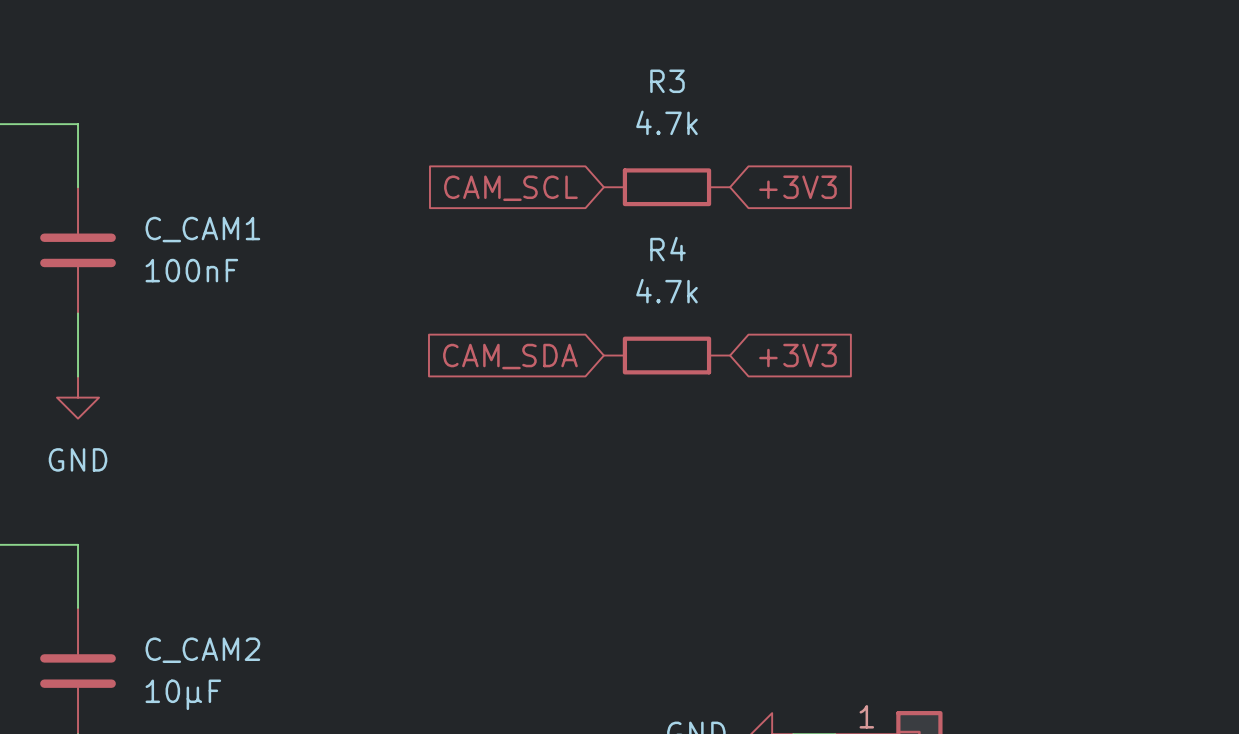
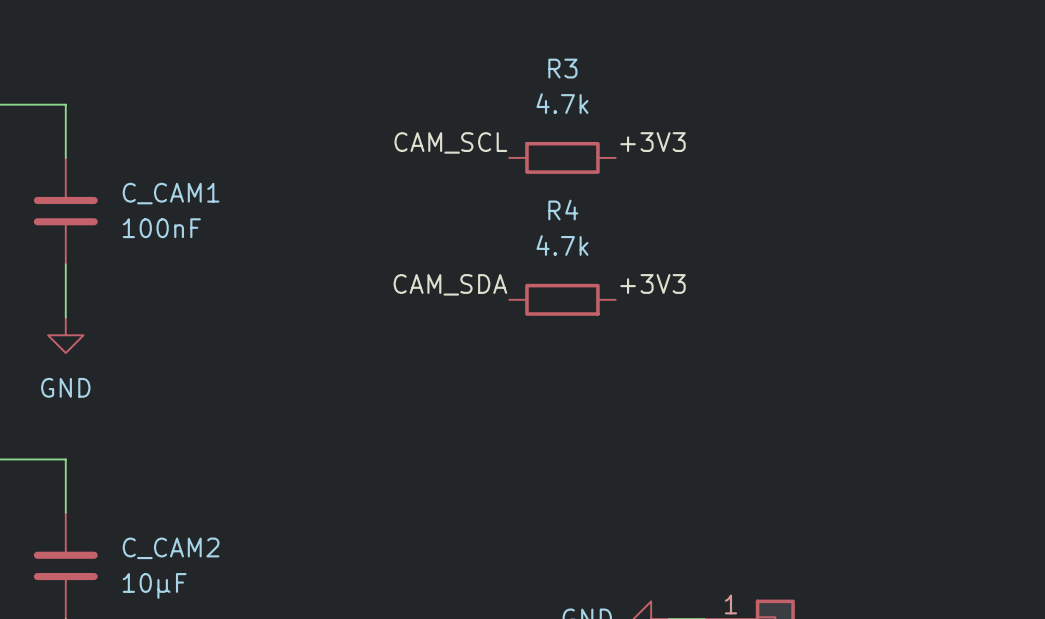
label: none -> +3V3 (652, 142)
label: none -> CAM_SCL (450, 142)
global label: +3V3 (797, 187) -> none
global label: CAM_SCL (510, 188) -> none
label: none -> +3V3 (652, 283)
label: none -> CAM_SDA (450, 284)
global label: +3V3 (797, 355) -> none
global label: CAM_SDA (510, 356) -> none

